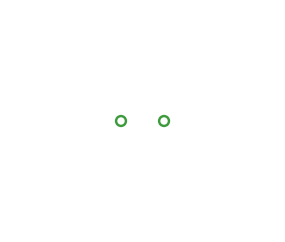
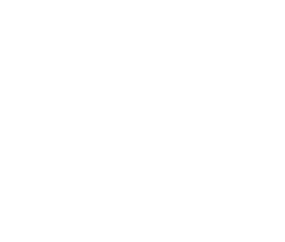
via: (120, 120) -> none
via: (164, 120) -> none

